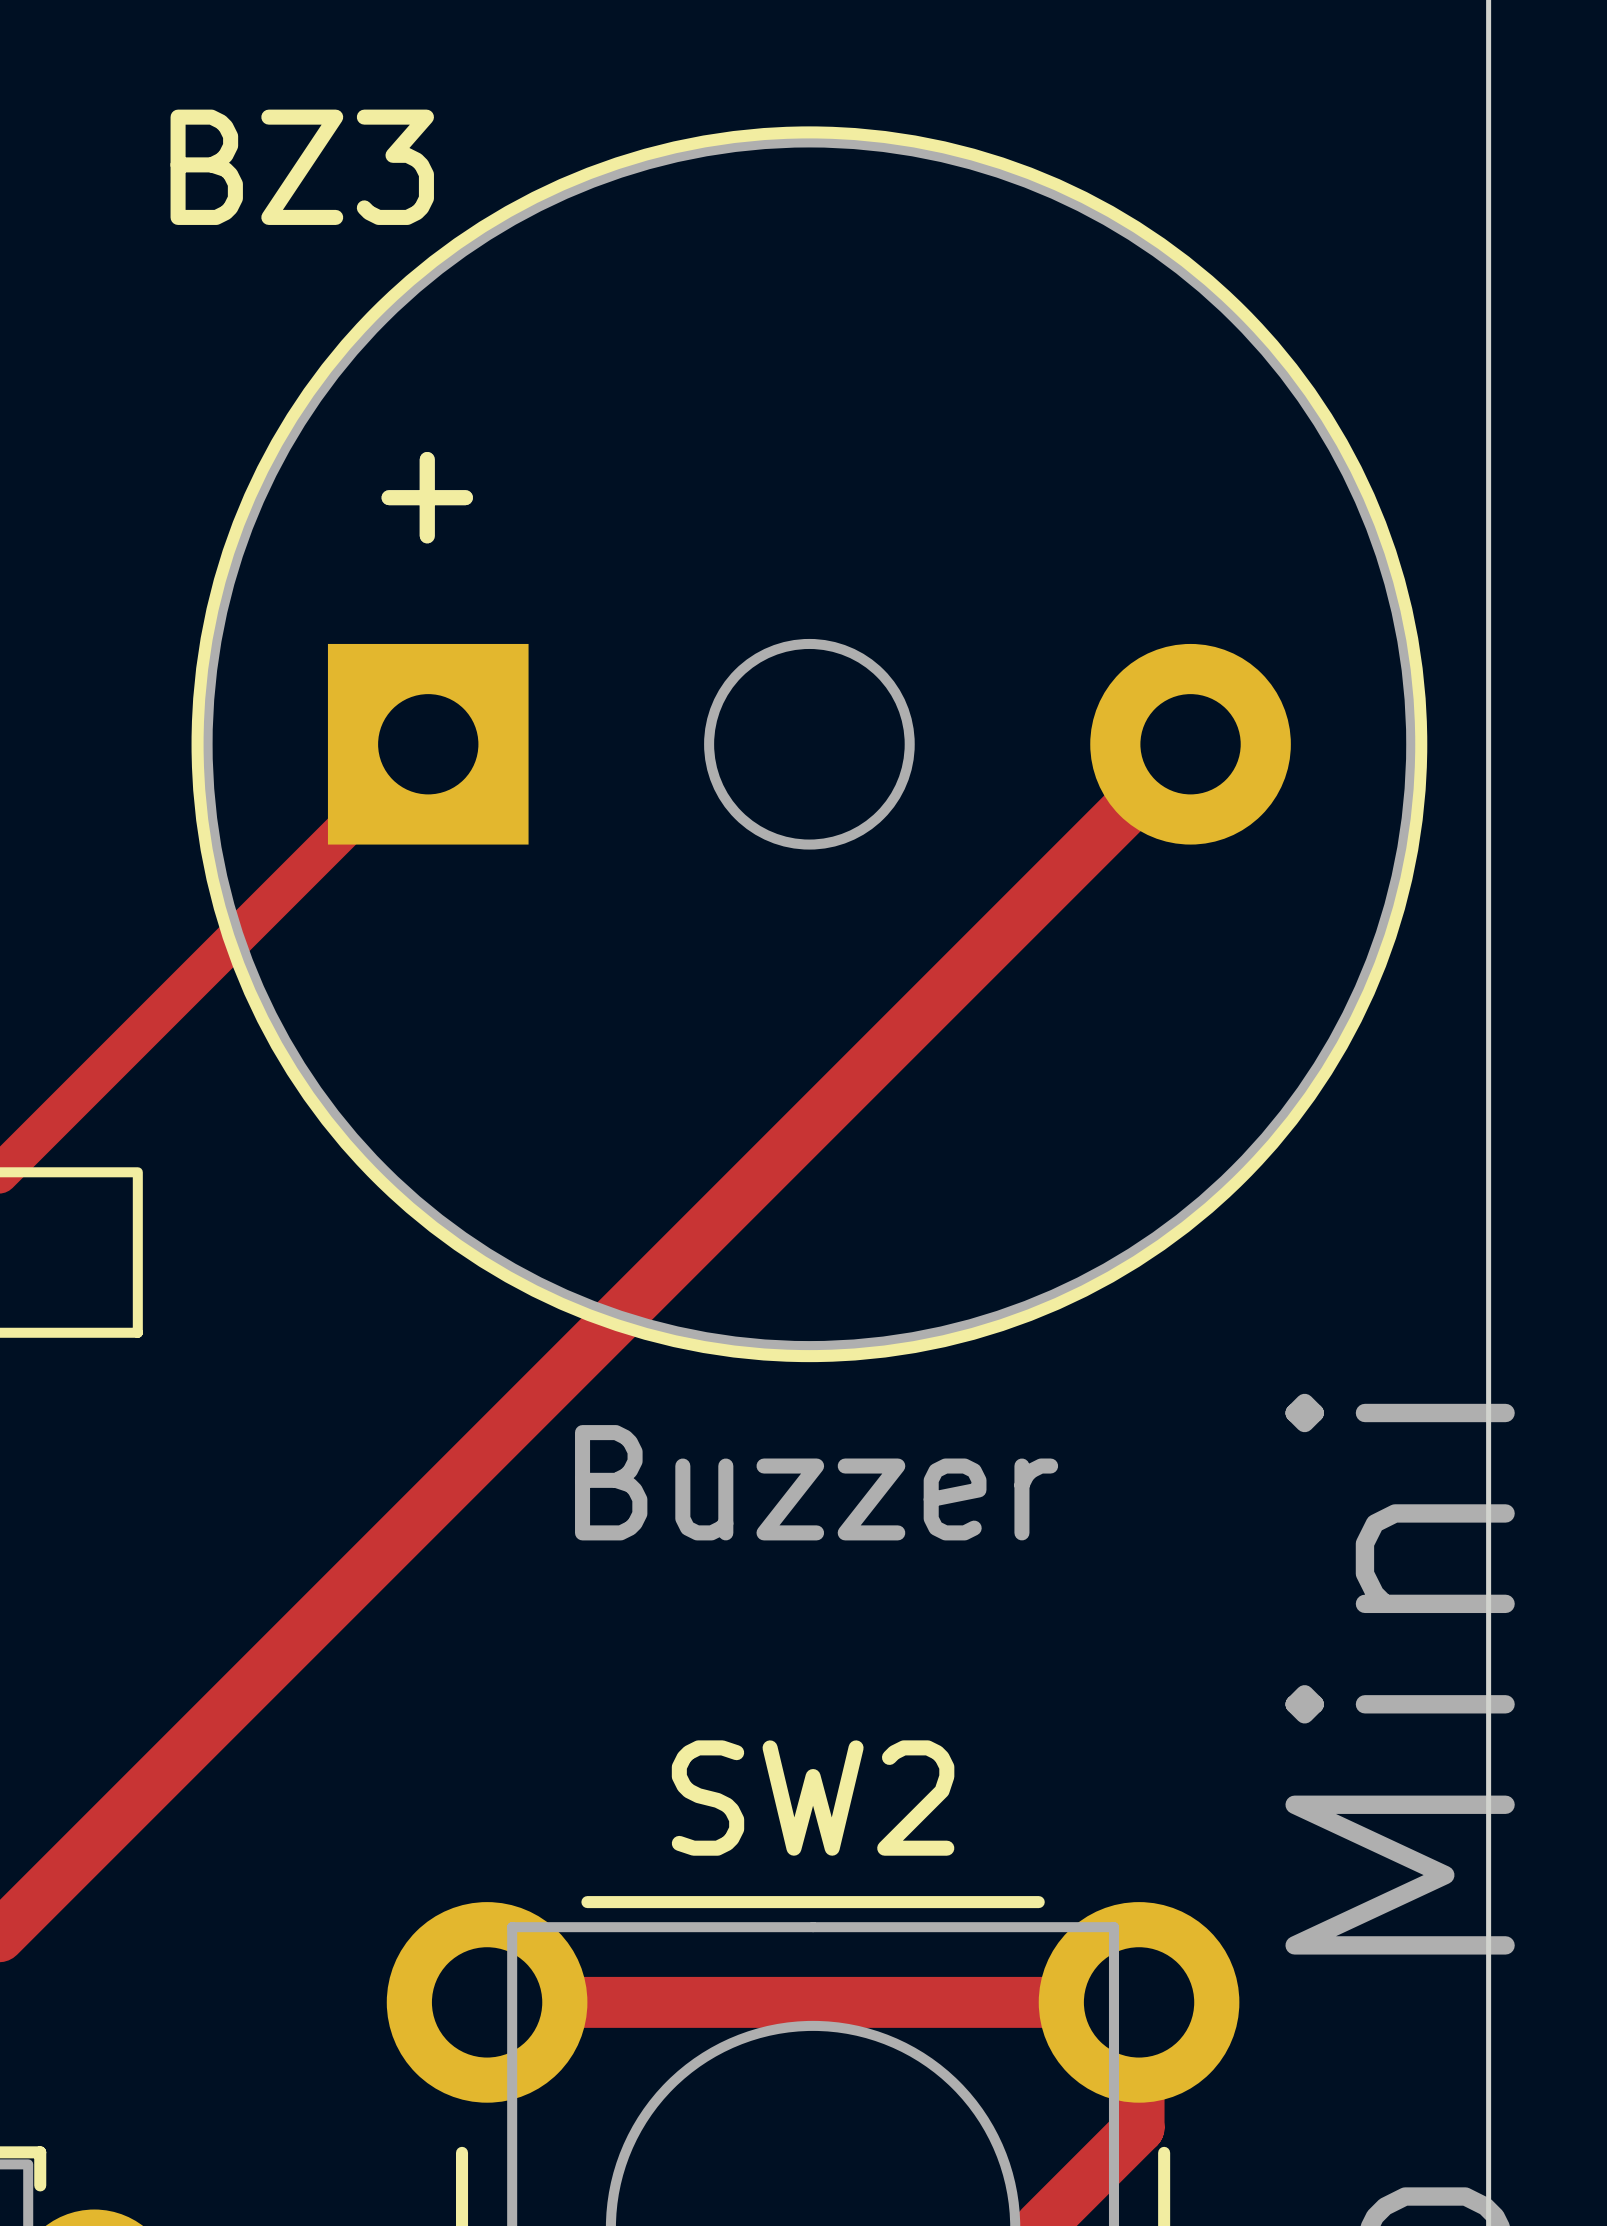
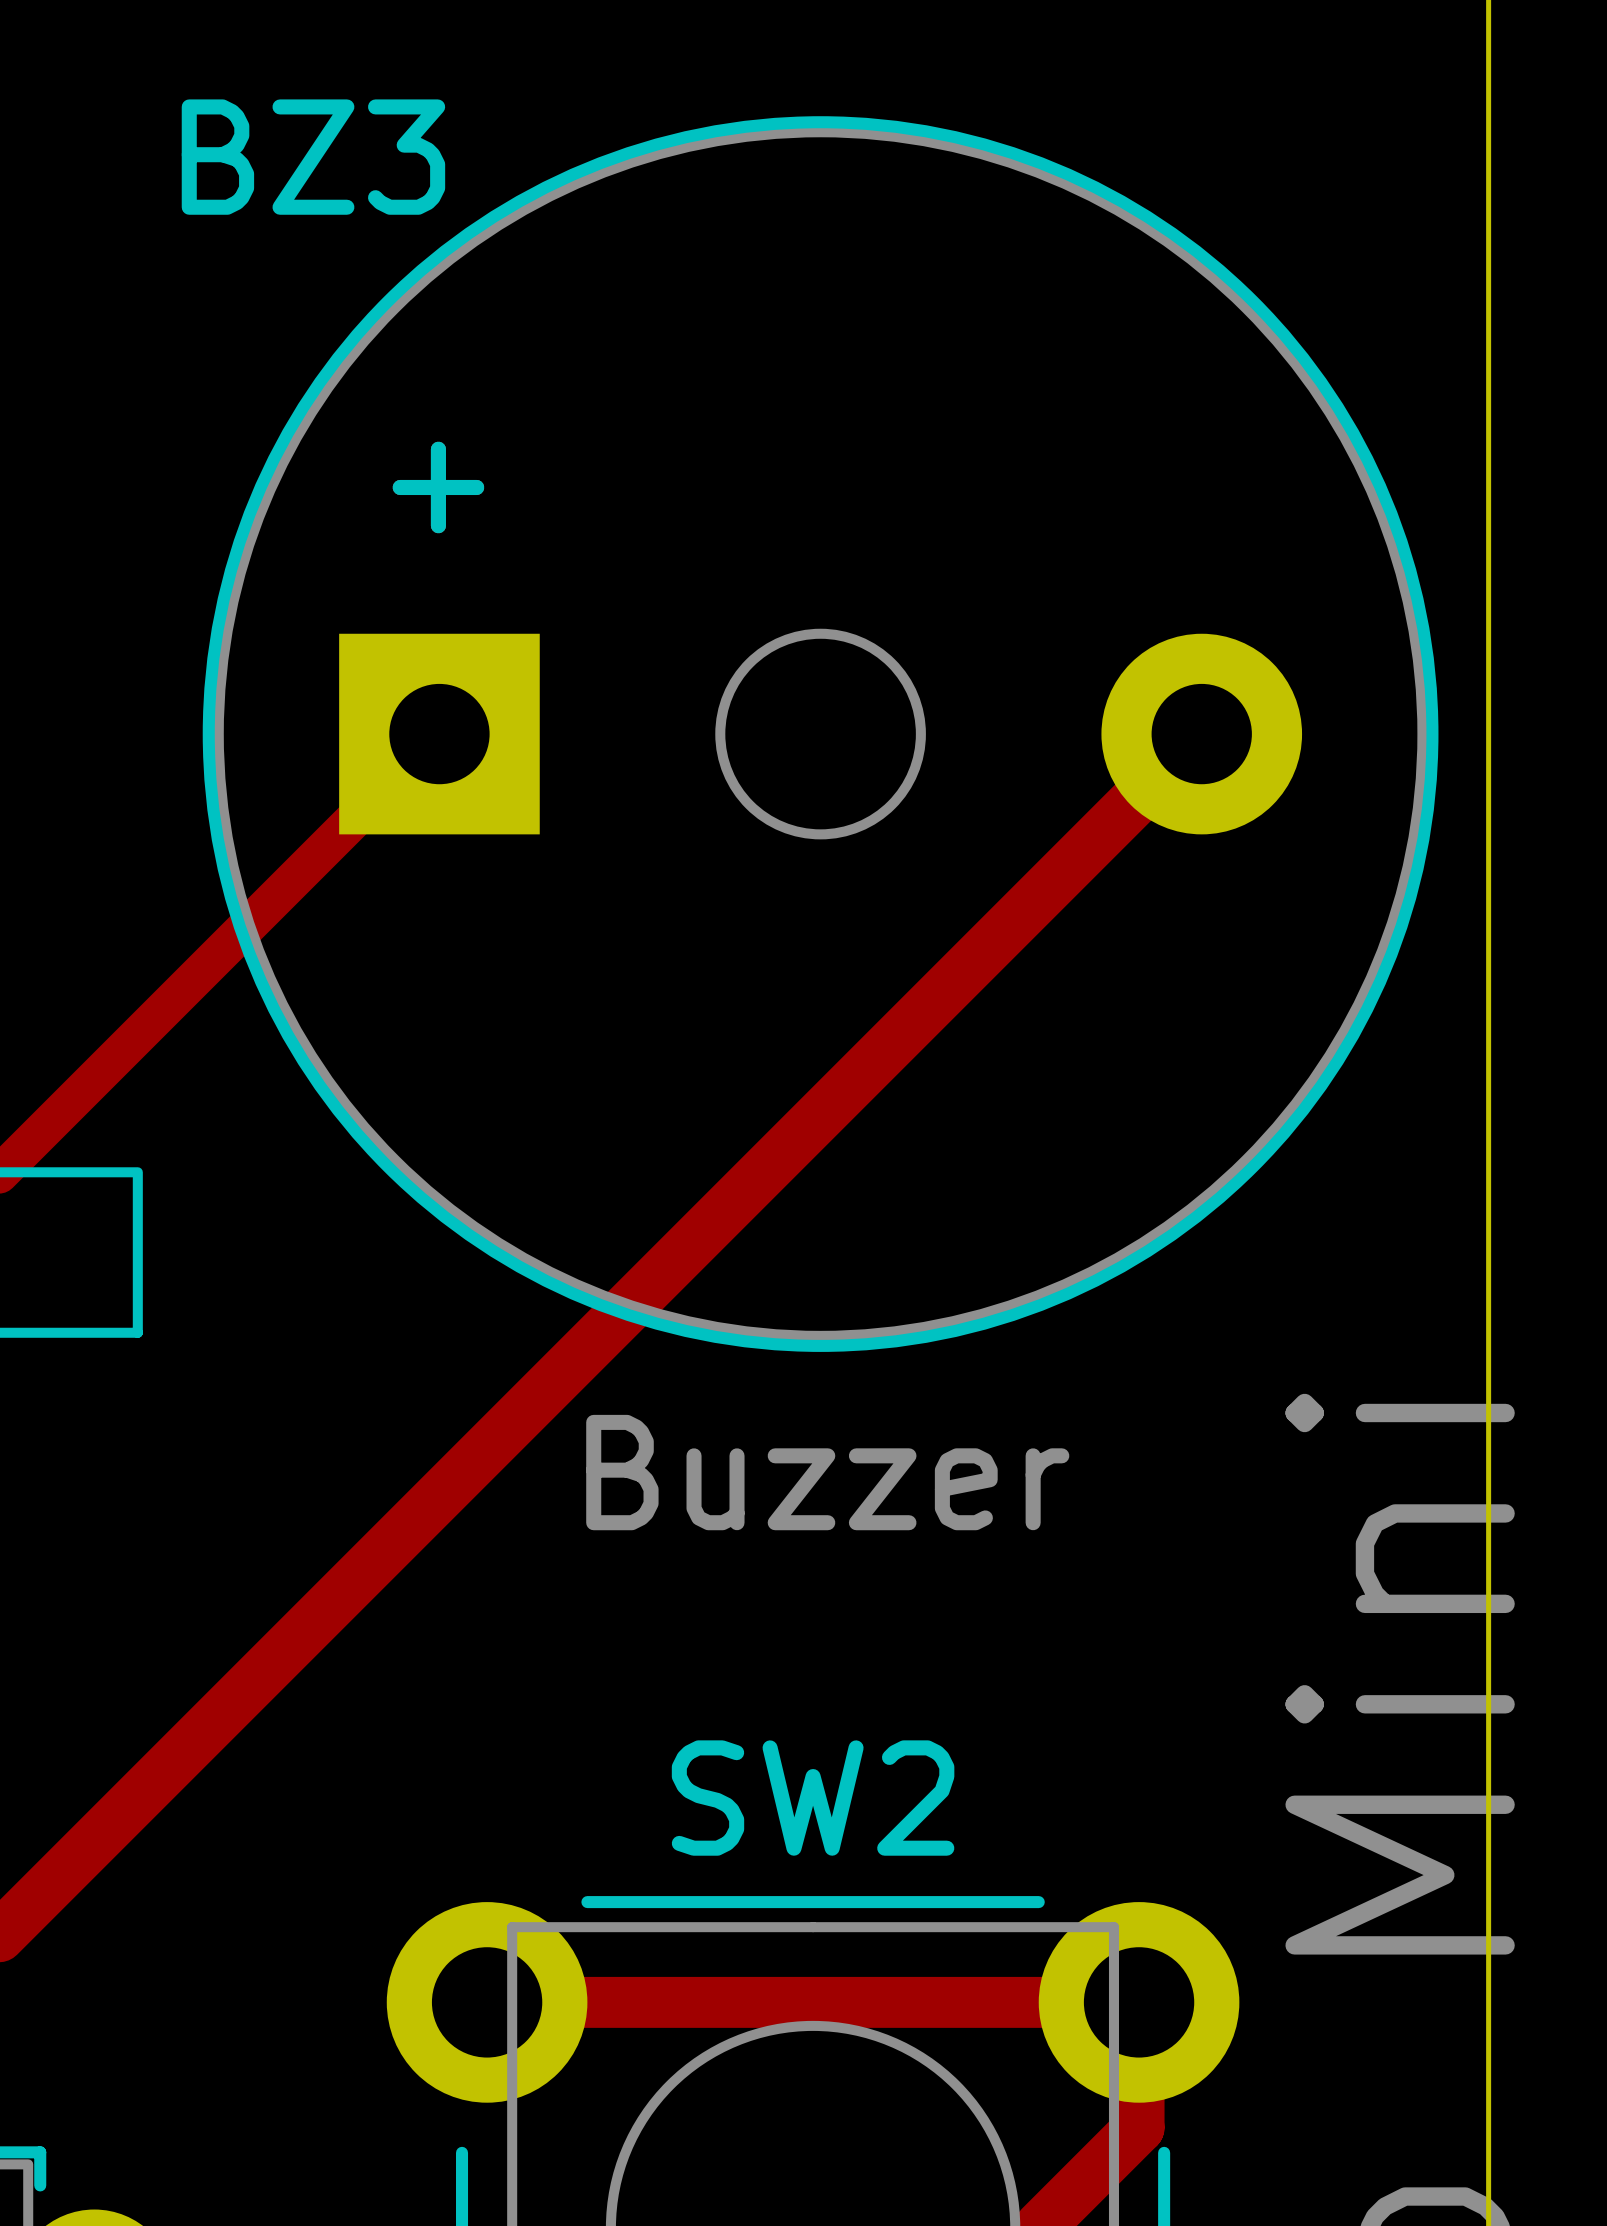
BZ3 position: (809, 744) -> (820, 734)

